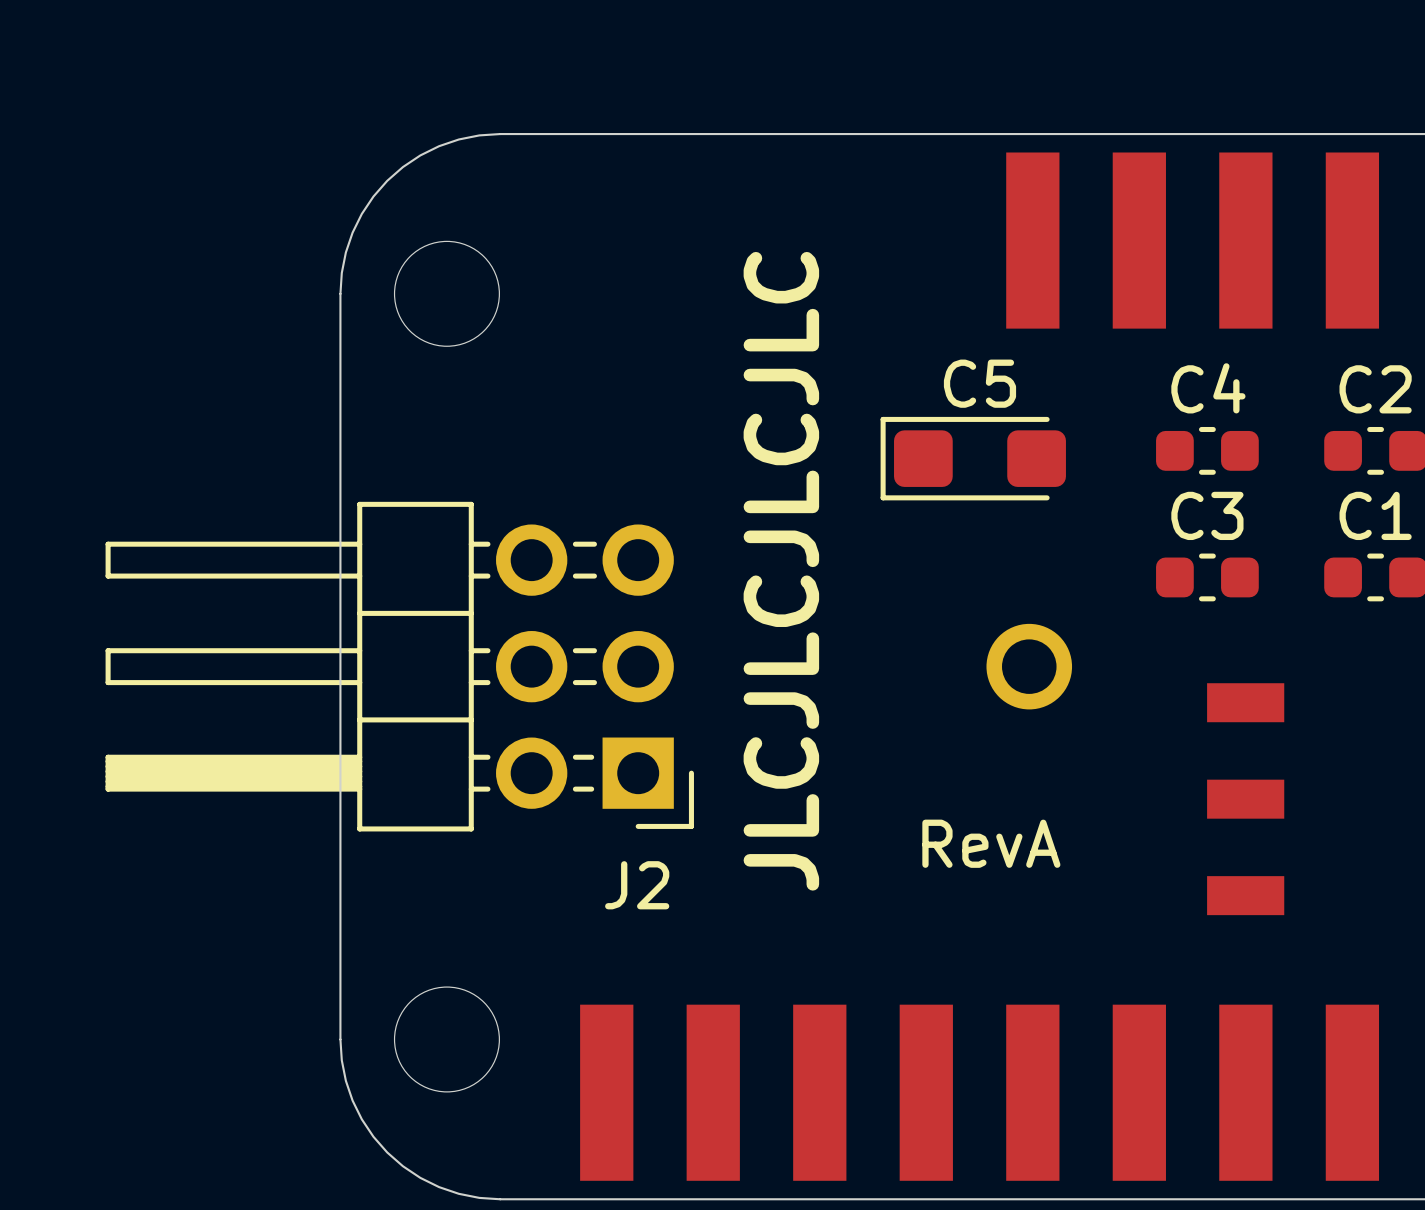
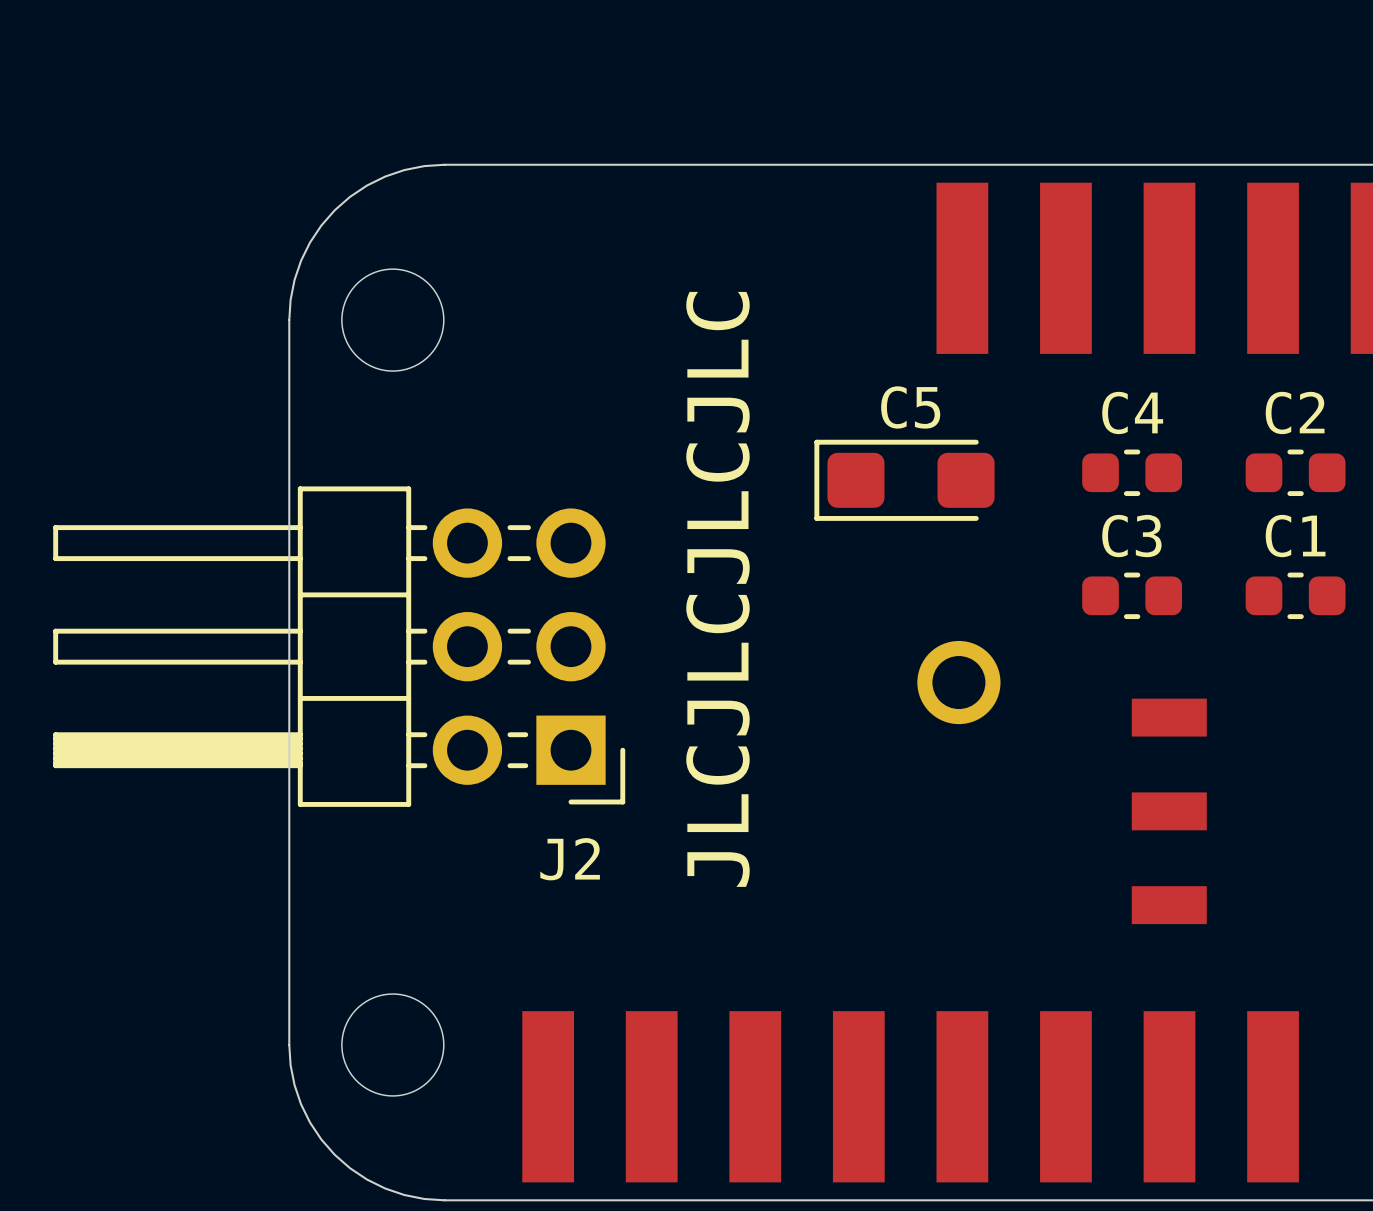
J2 position: (399, 666) -> (339, 646)
text: RevA (991, 843) -> none

